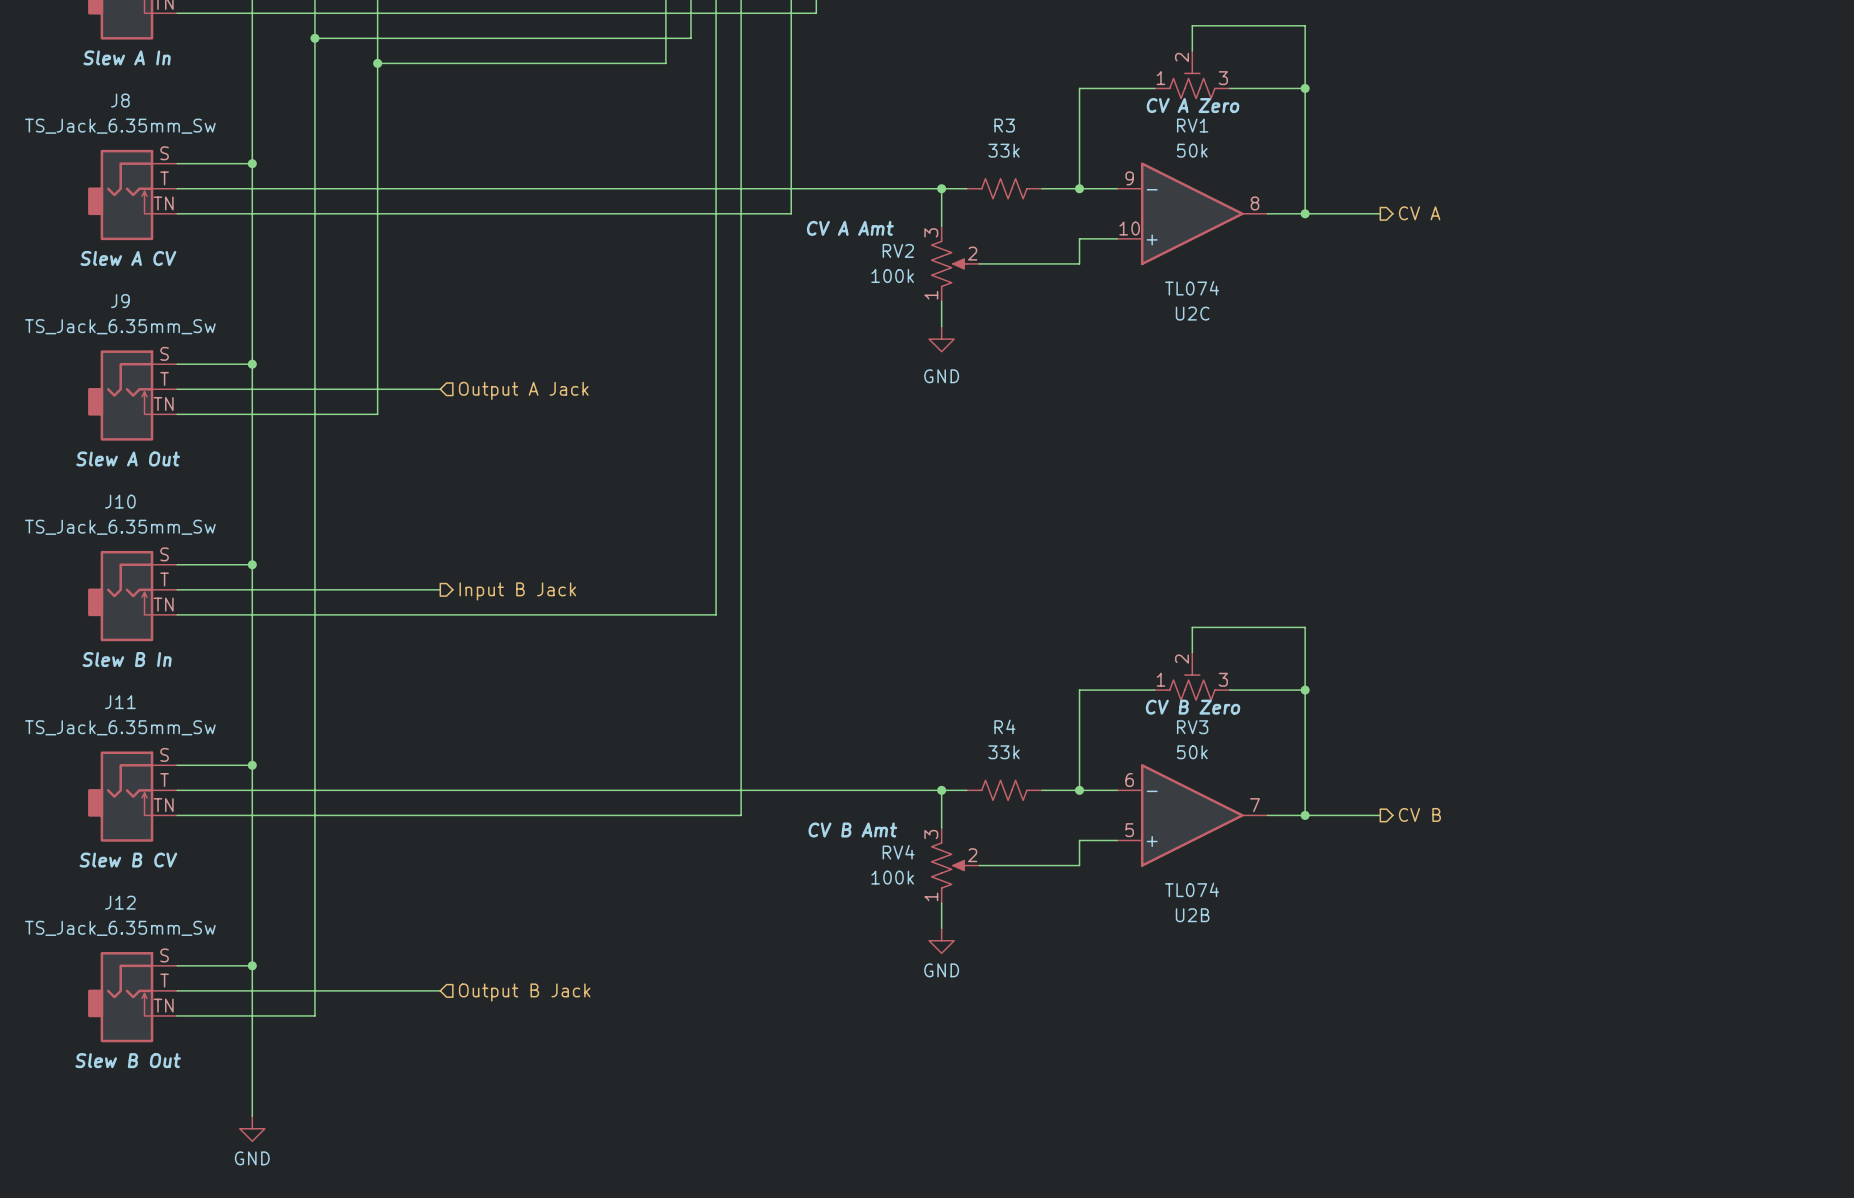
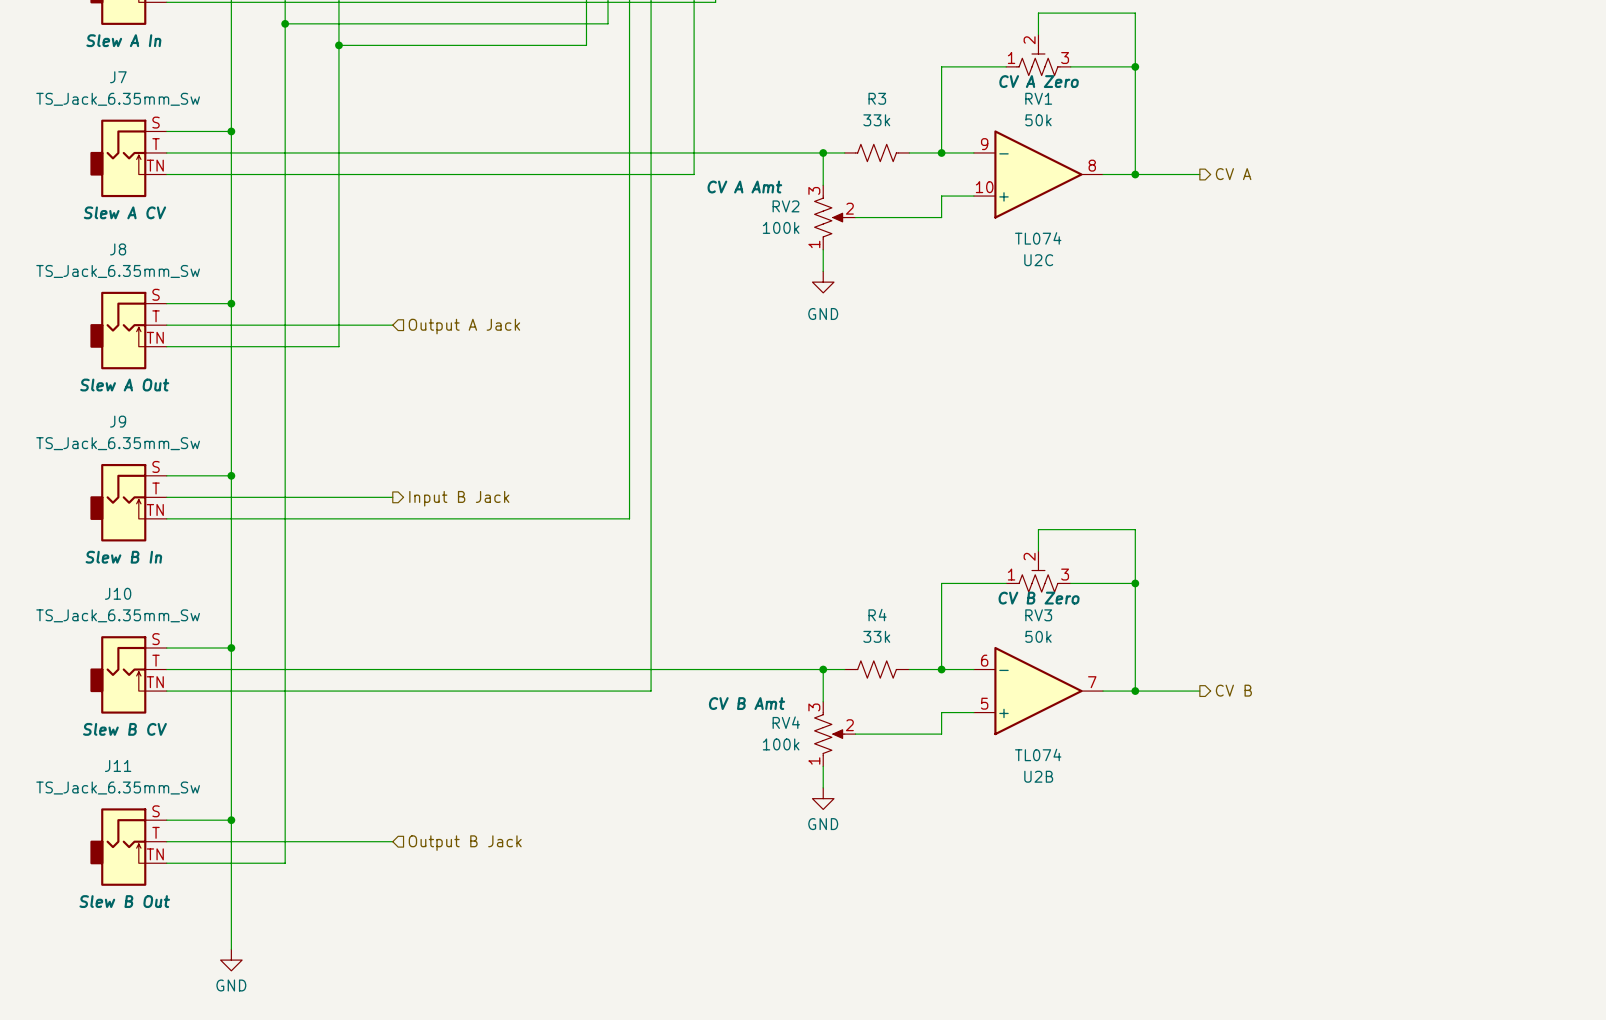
J8 name: J8 (120, 100) -> J7 (118, 77)
J9 name: J9 (120, 301) -> J8 (118, 249)
J10 name: J10 (120, 501) -> J9 (118, 421)
J11 name: J11 (120, 702) -> J10 (118, 593)
J12 name: J12 (120, 902) -> J11 (118, 765)

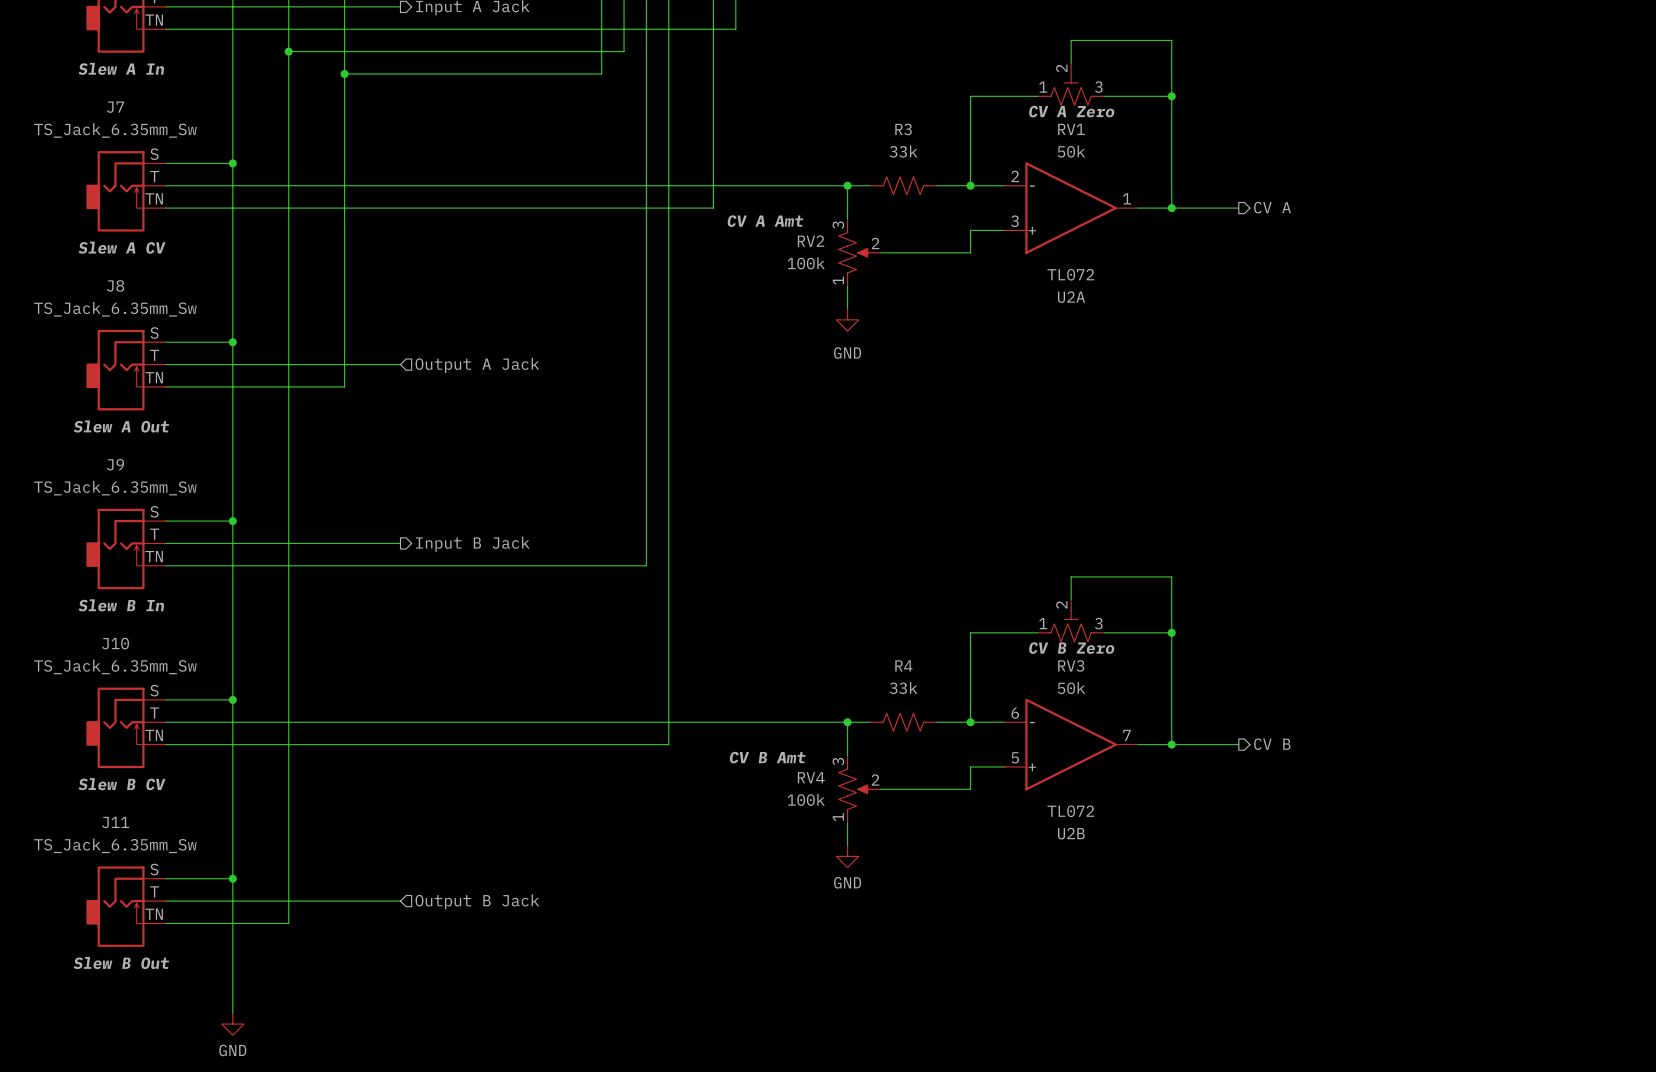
U2C pin number: 9 (984, 144) -> 2 (1015, 176)
U2C pin number: 8 (1092, 165) -> 1 (1127, 198)
U2C pin number: 10 (984, 187) -> 3 (1014, 221)
U2C value: TL074 (1038, 238) -> TL072 (1070, 274)
U2C name: U2C (1038, 260) -> U2A (1071, 297)
U2B value: TL074 (1038, 754) -> TL072 (1070, 811)

